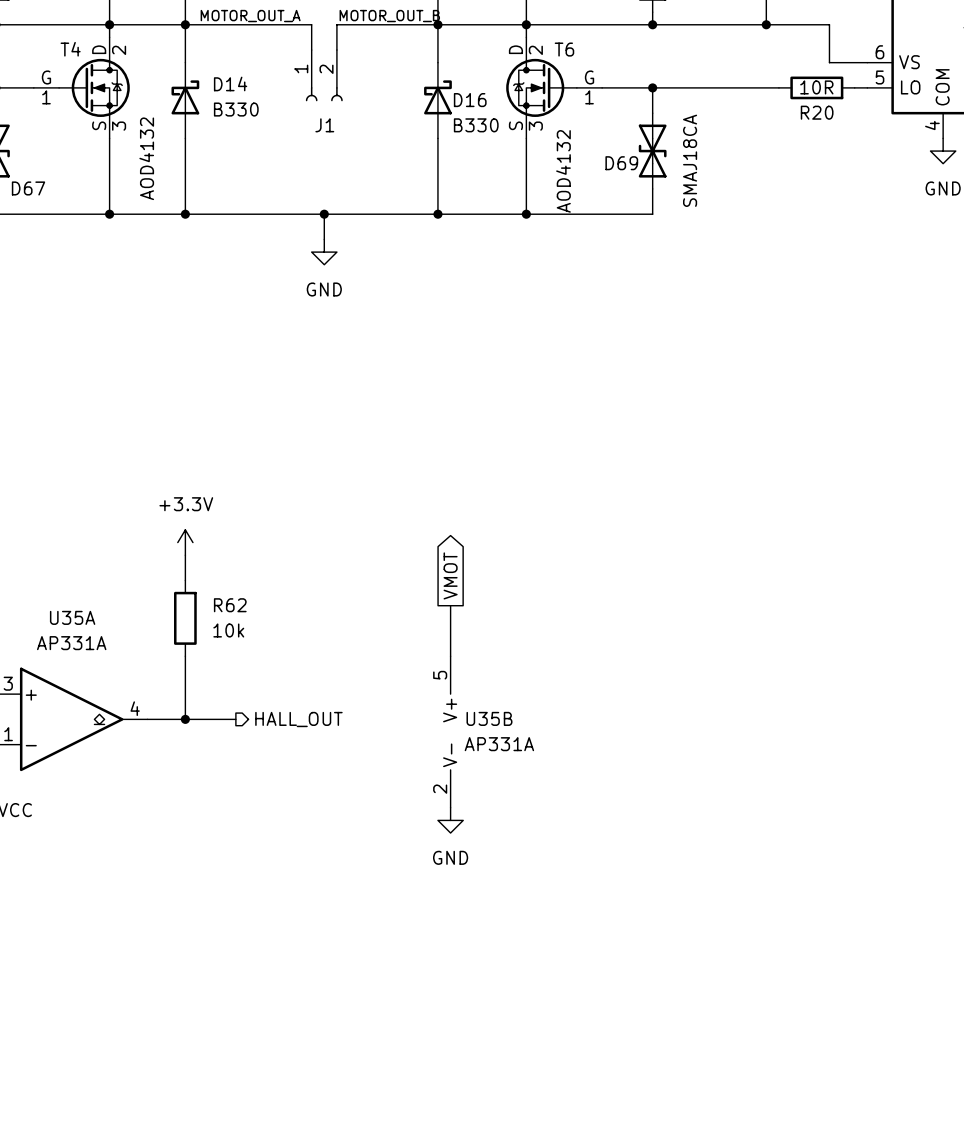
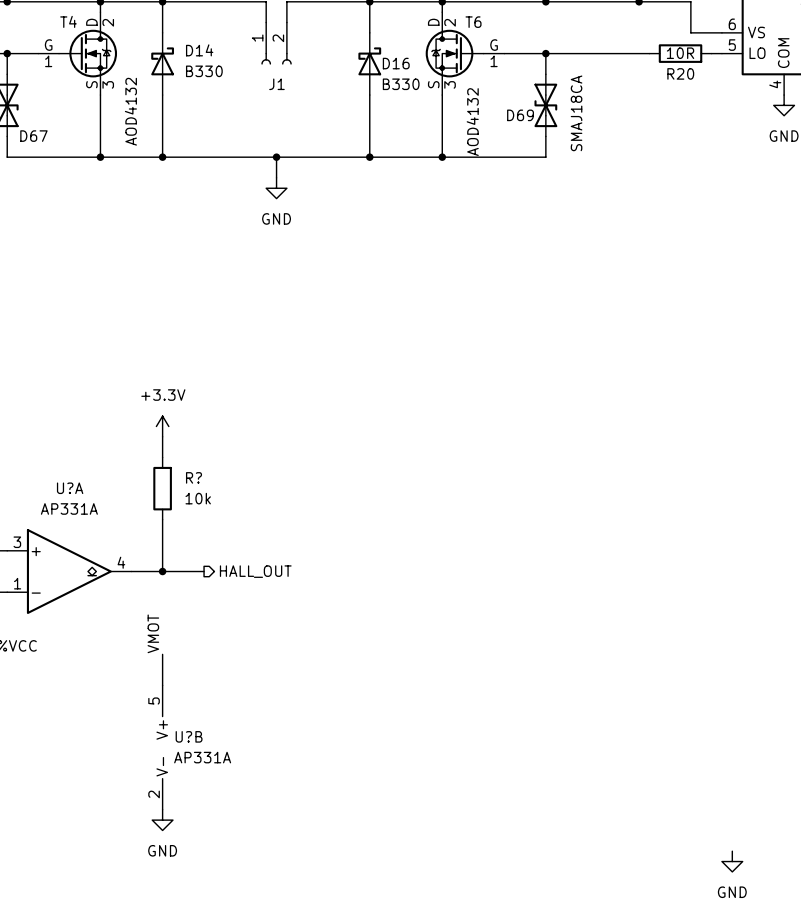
global label: VMOT (450, 575) -> none
R62 name: R62 (230, 605) -> R? (194, 477)
wire: (450, 605) (450, 656) -> none
U35A name: U35A (72, 617) -> U?A (70, 488)
U35B: AP331A (450, 732) -> none
label: none -> VMOT (153, 633)
wire: none -> (162, 654) (162, 685)
power symbol: GND (450, 820) -> none
U?B: none -> AP331A (162, 747)
power symbol: none -> GND (162, 820)
power symbol: none -> GND (732, 861)

